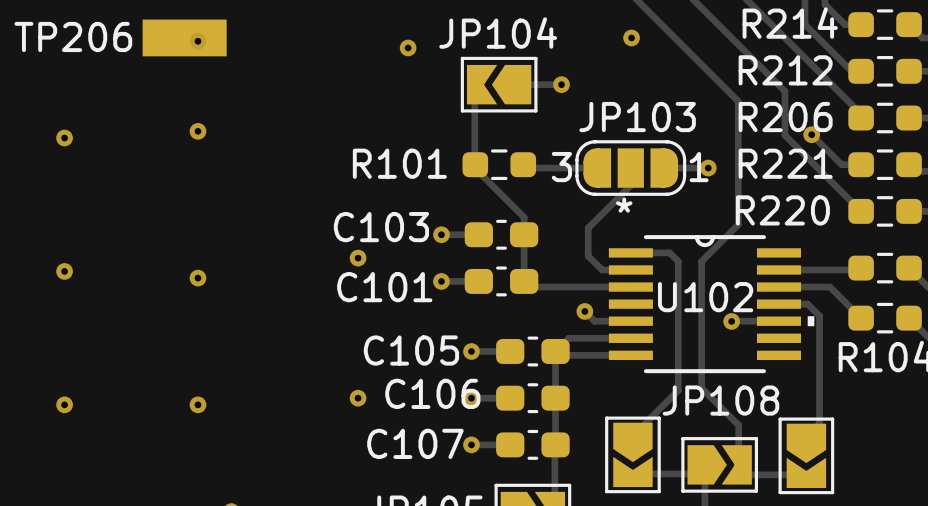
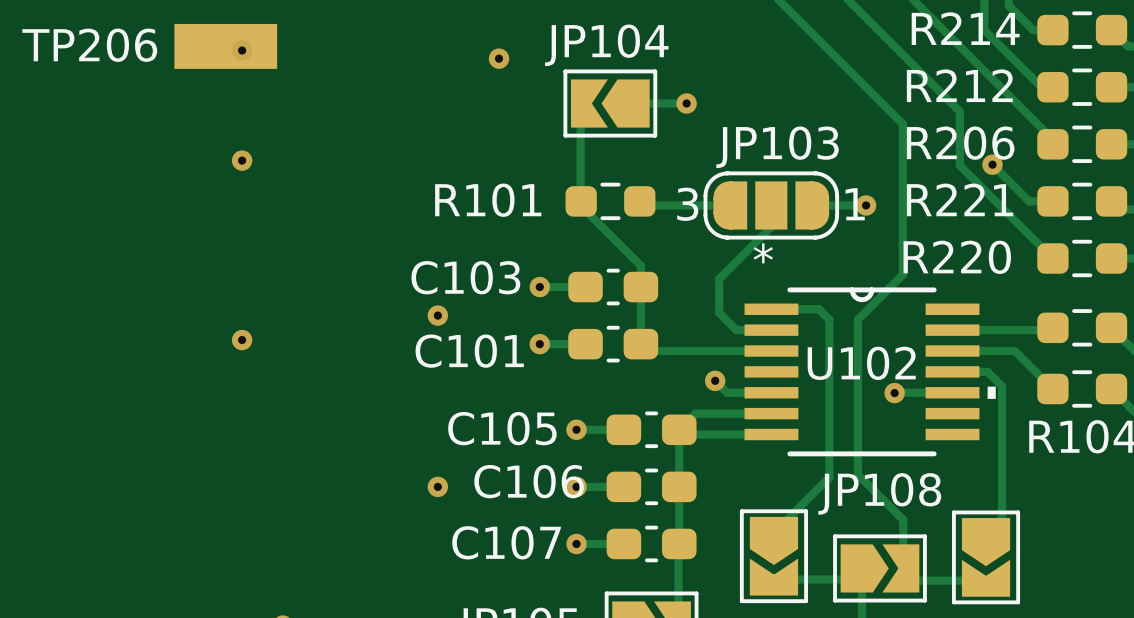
via: (631, 37) -> none
via: (64, 138) -> none
via: (64, 271) -> none
via: (64, 404) -> none
via: (197, 404) -> none

